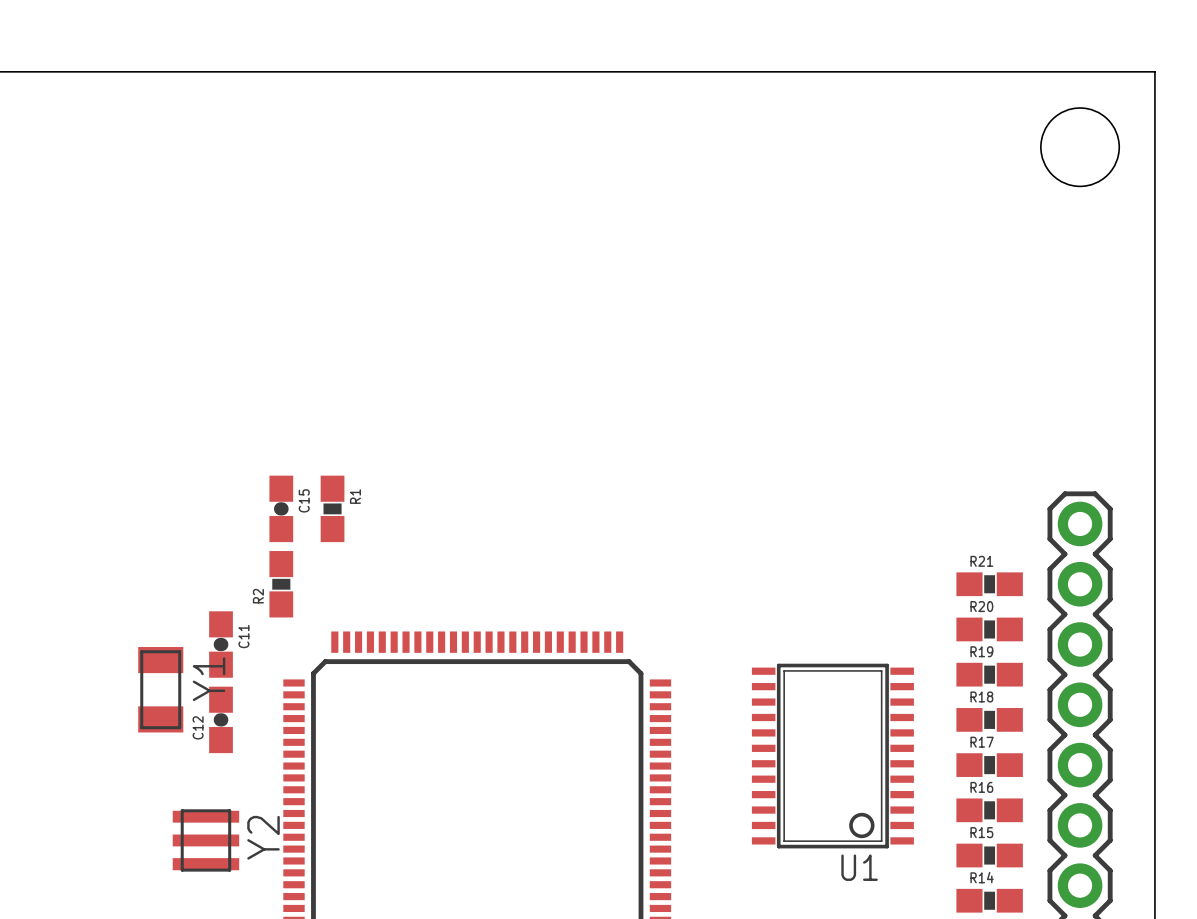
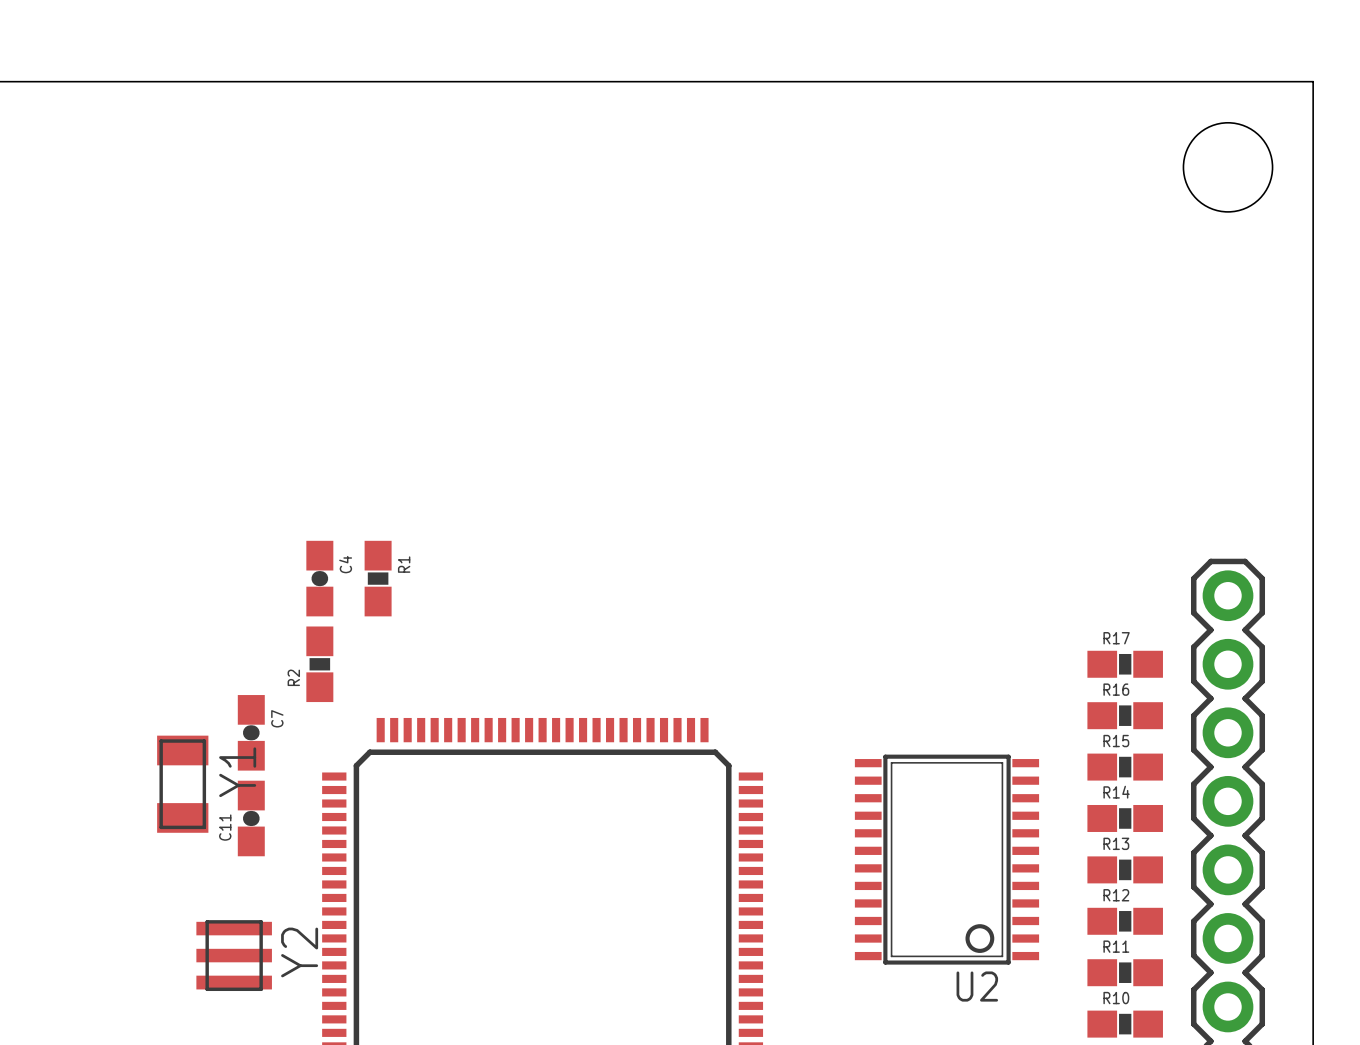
C15 name: C15 (304, 500) -> C4 (345, 564)
R21 name: R21 (981, 561) -> R17 (1116, 638)
R20 name: R20 (981, 606) -> R16 (1116, 689)
C11 name: C11 (243, 636) -> C7 (277, 718)
R19 name: R19 (981, 651) -> R15 (1116, 741)
R18 name: R18 (981, 696) -> R14 (1116, 792)
C12 name: C12 (198, 727) -> C11 (225, 827)
R17 name: R17 (982, 742) -> R13 (1116, 843)
R16 name: R16 (981, 787) -> R12 (1116, 895)
R15 name: R15 (981, 832) -> R11 (1116, 946)
U1 name: U1 (859, 867) -> U2 (977, 986)
R14 name: R14 (982, 877) -> R10 (1116, 998)

